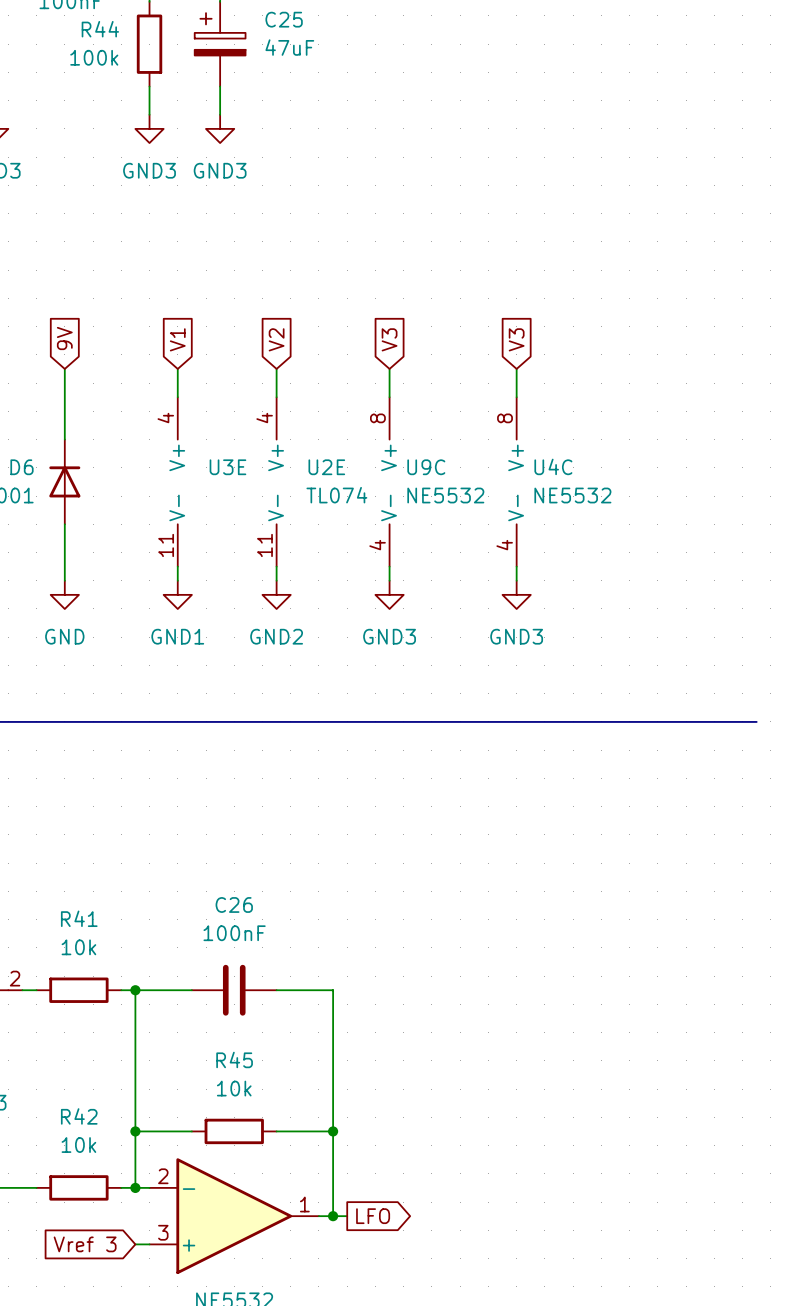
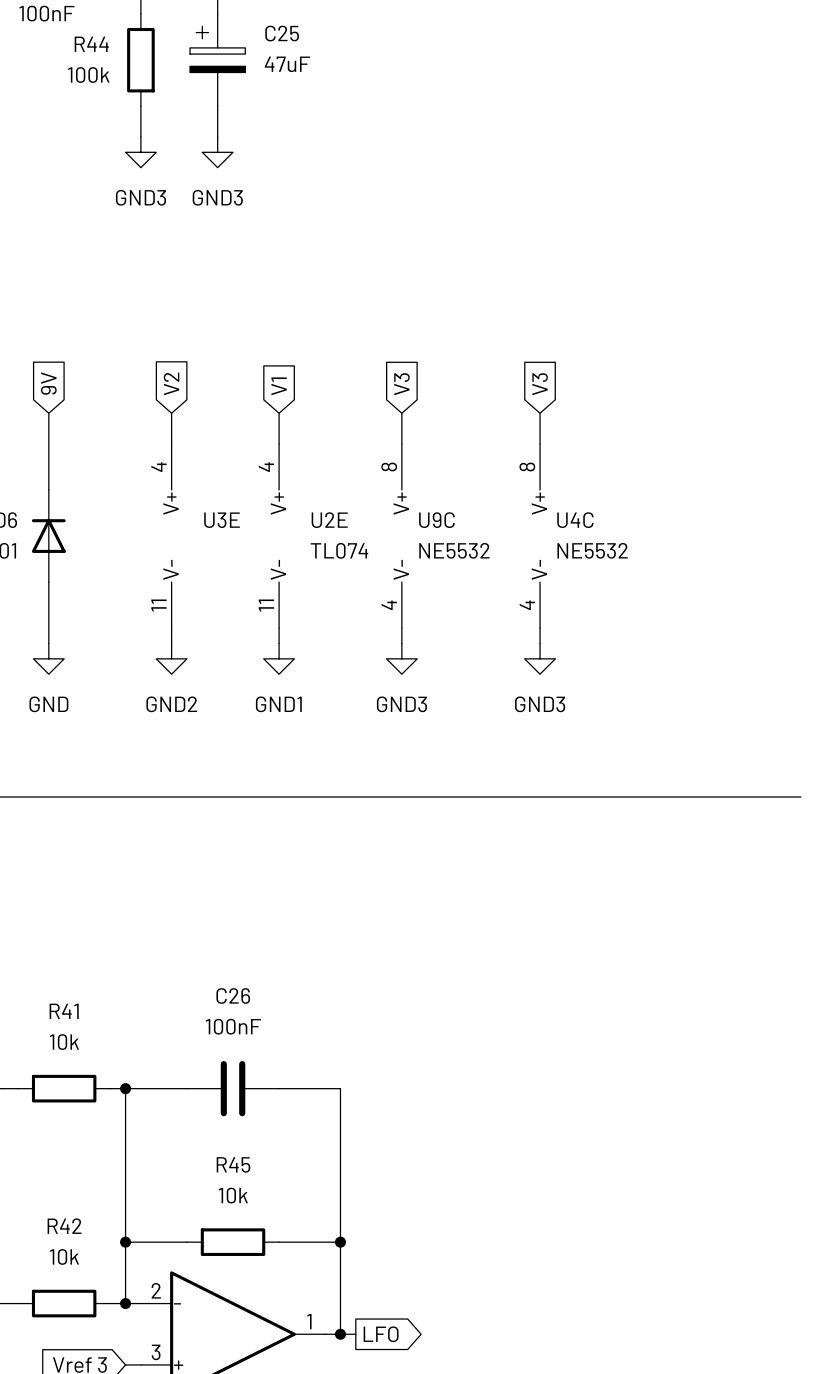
global label: V1 (177, 339) -> V2 (171, 383)
global label: V2 (276, 339) -> V1 (279, 386)
power symbol: GND1 (177, 594) -> GND2 (171, 658)
power symbol: GND2 (276, 594) -> GND1 (279, 658)

